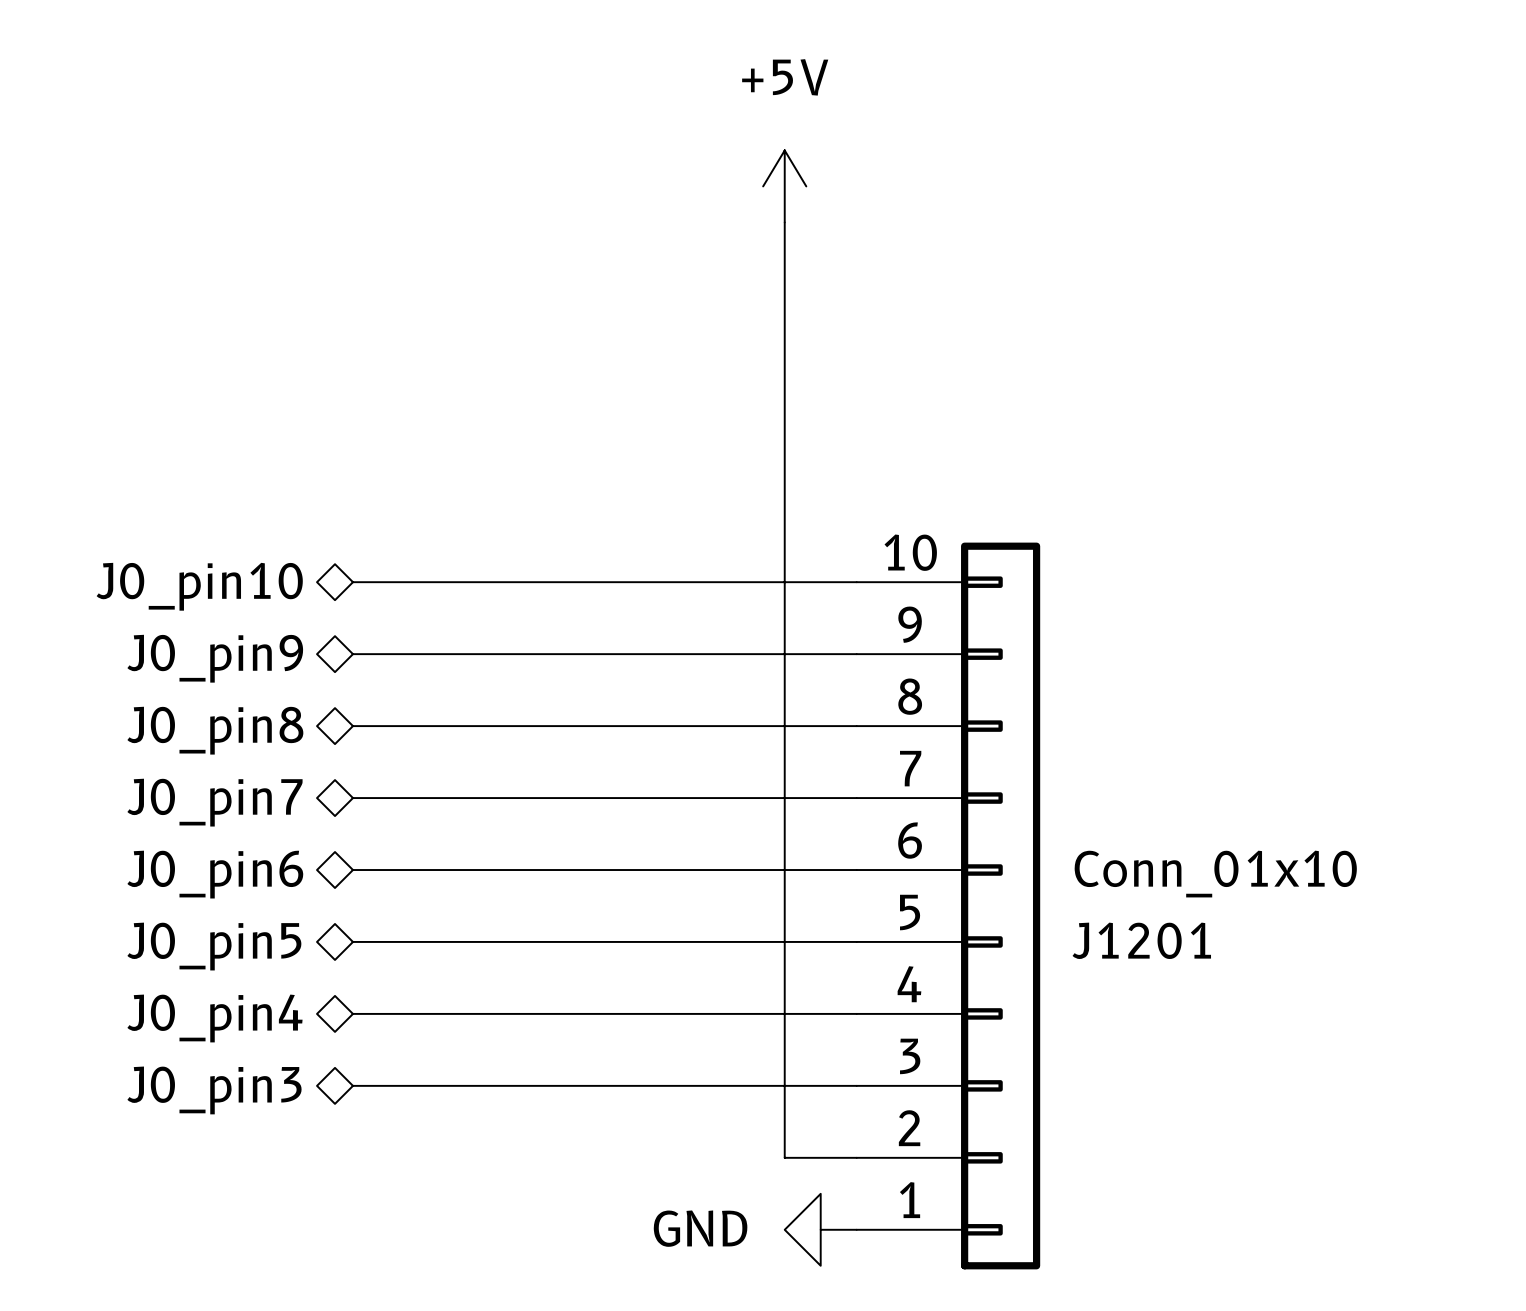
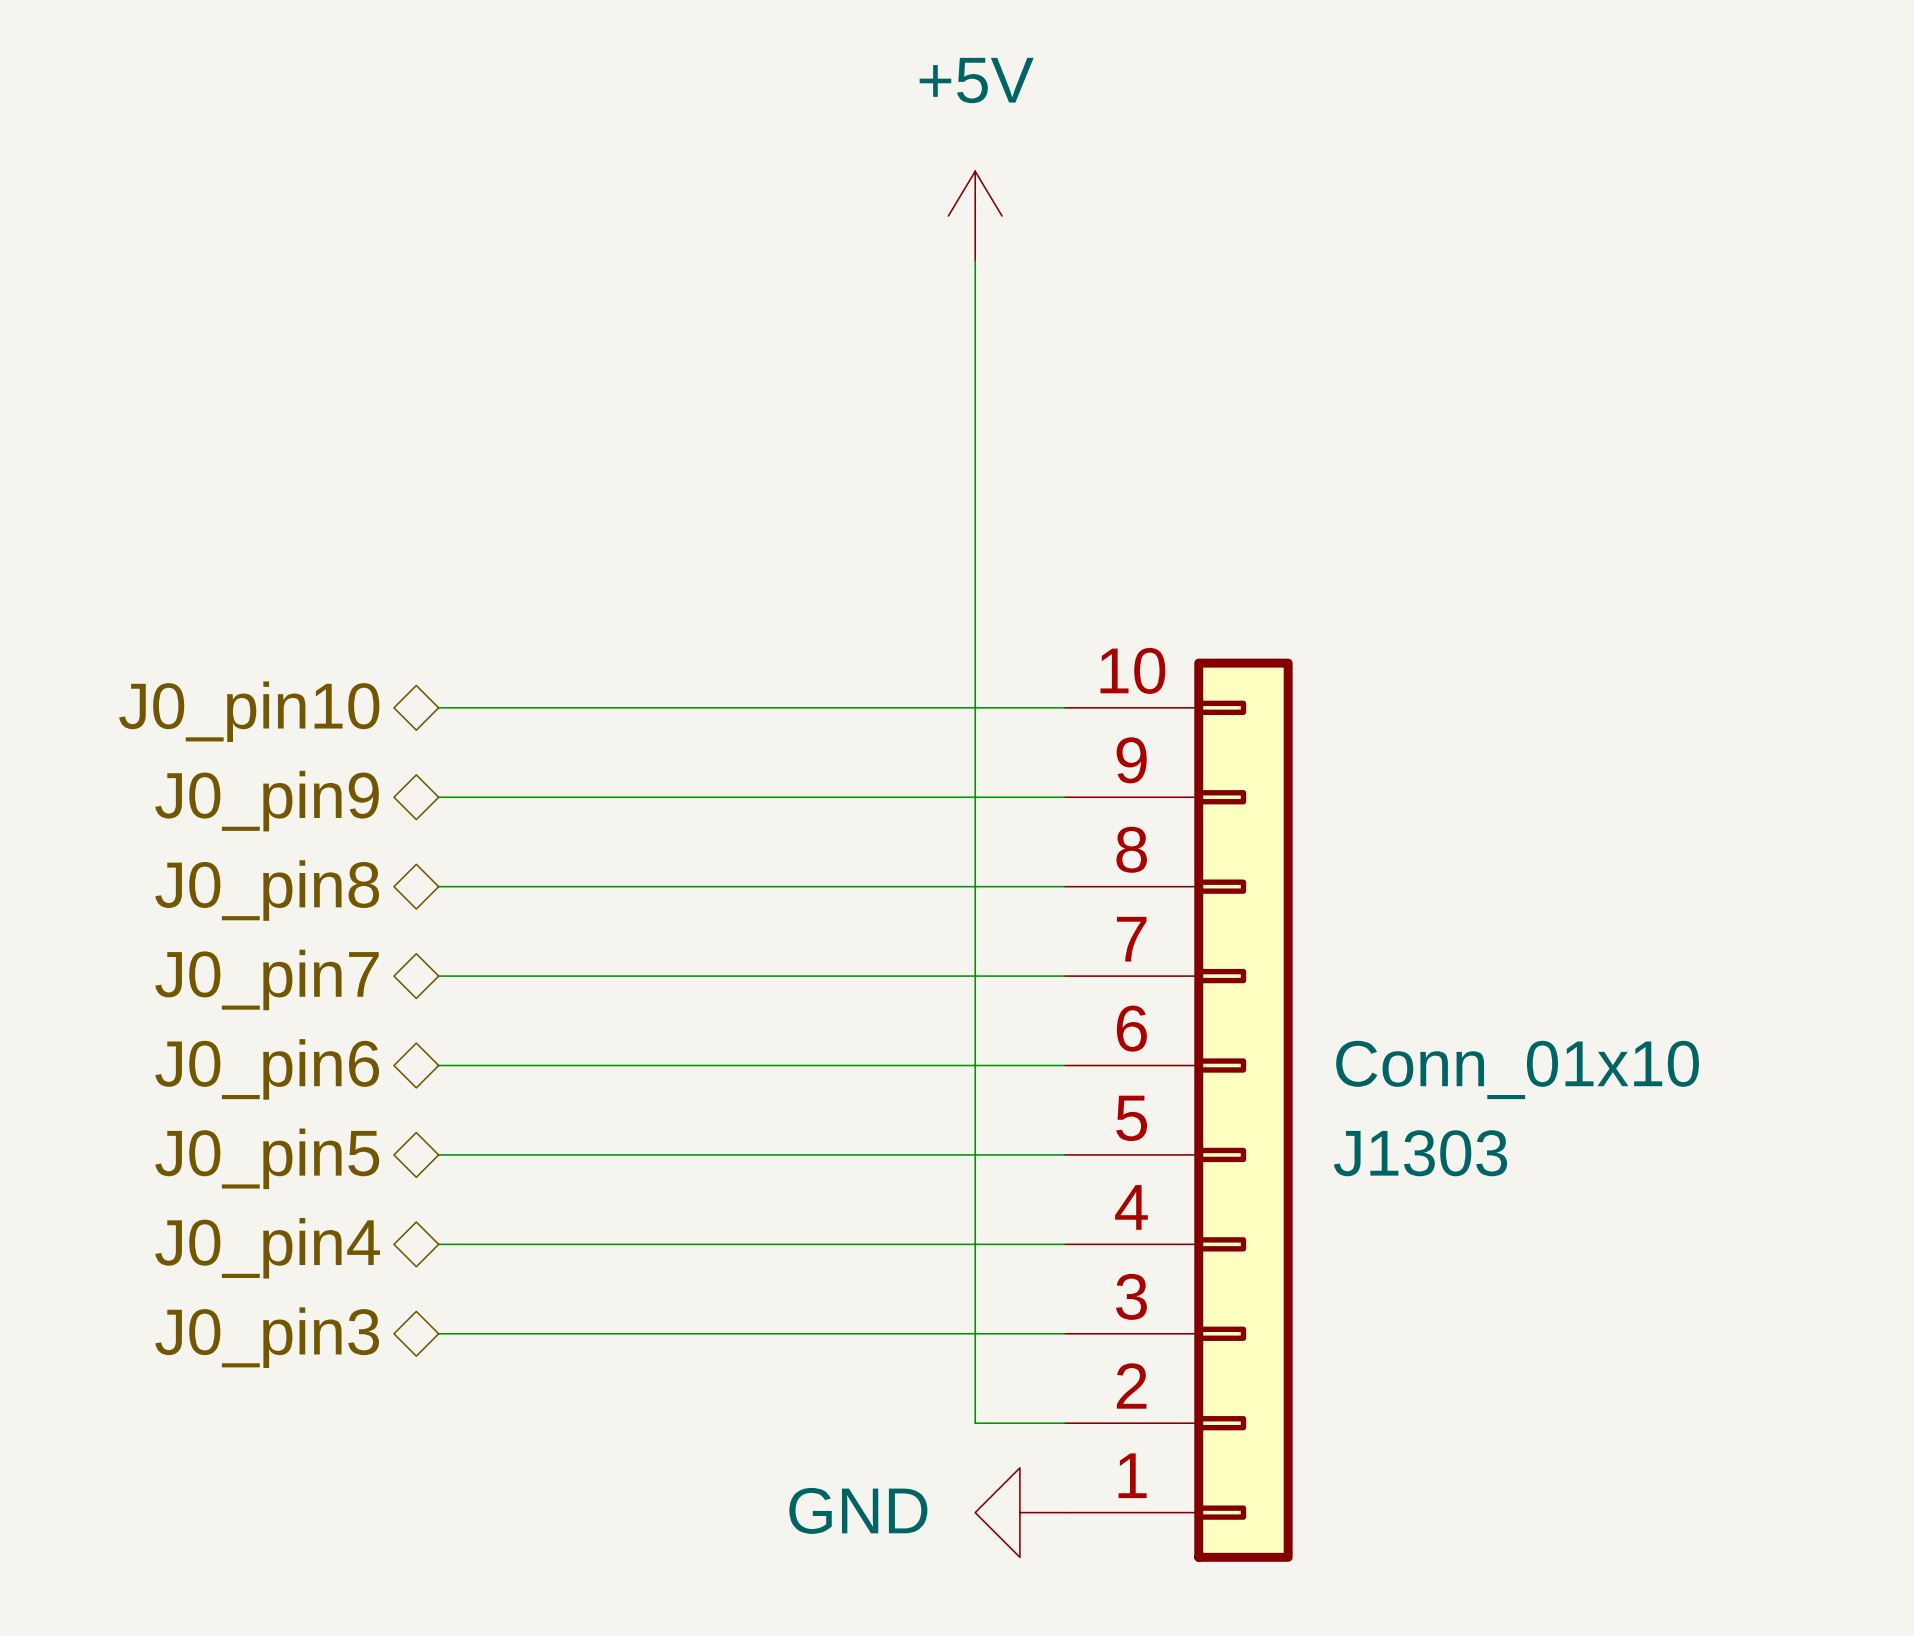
J1201 name: J1201 (1141, 940) -> J1303 (1420, 1153)

